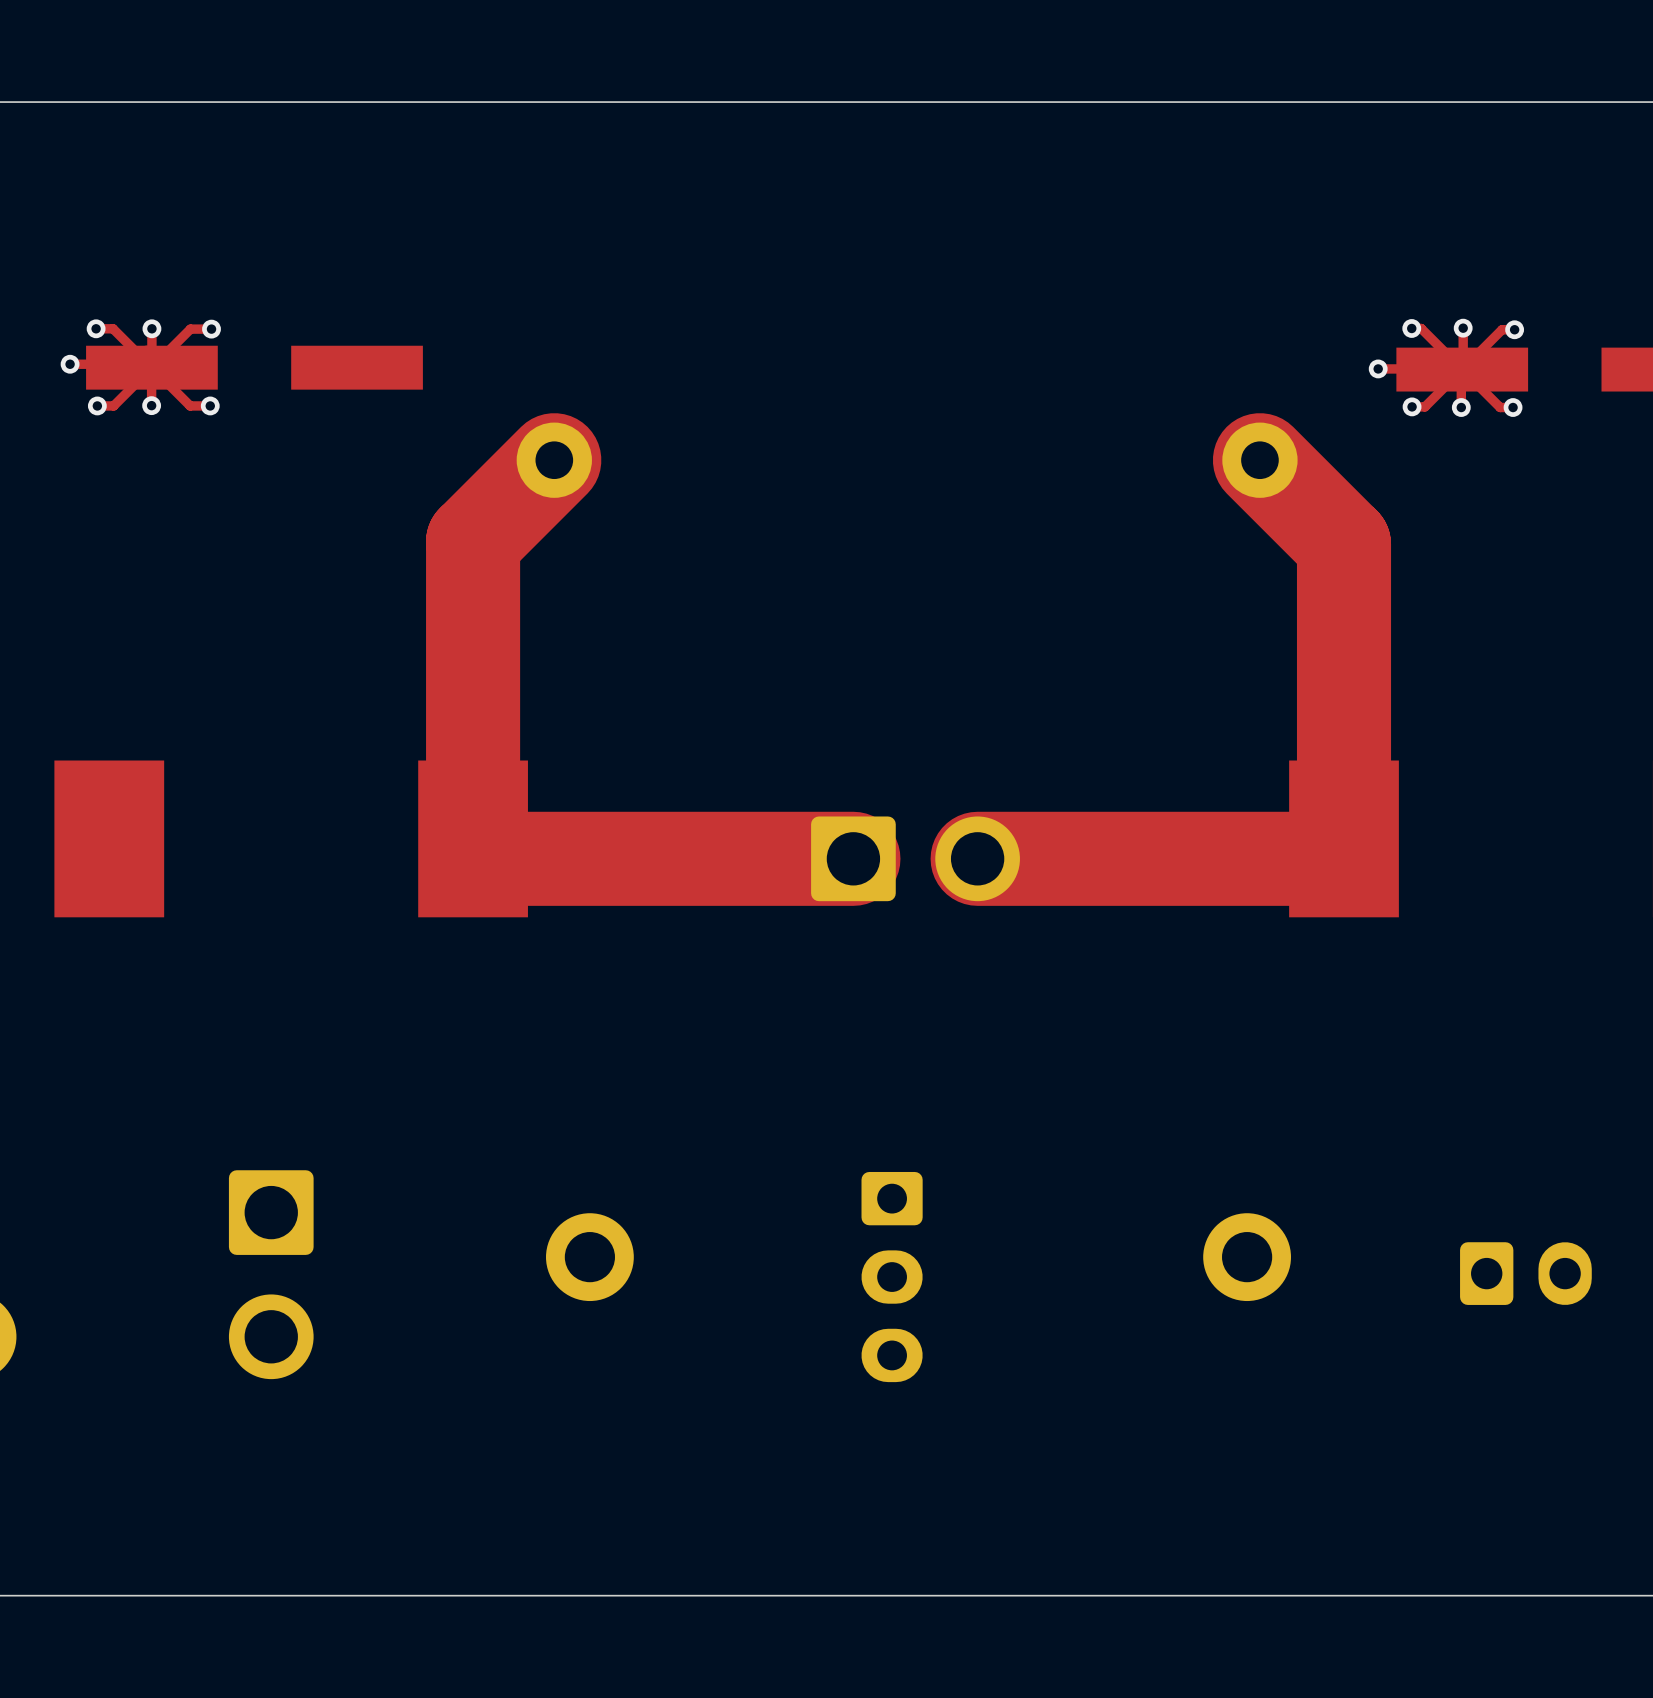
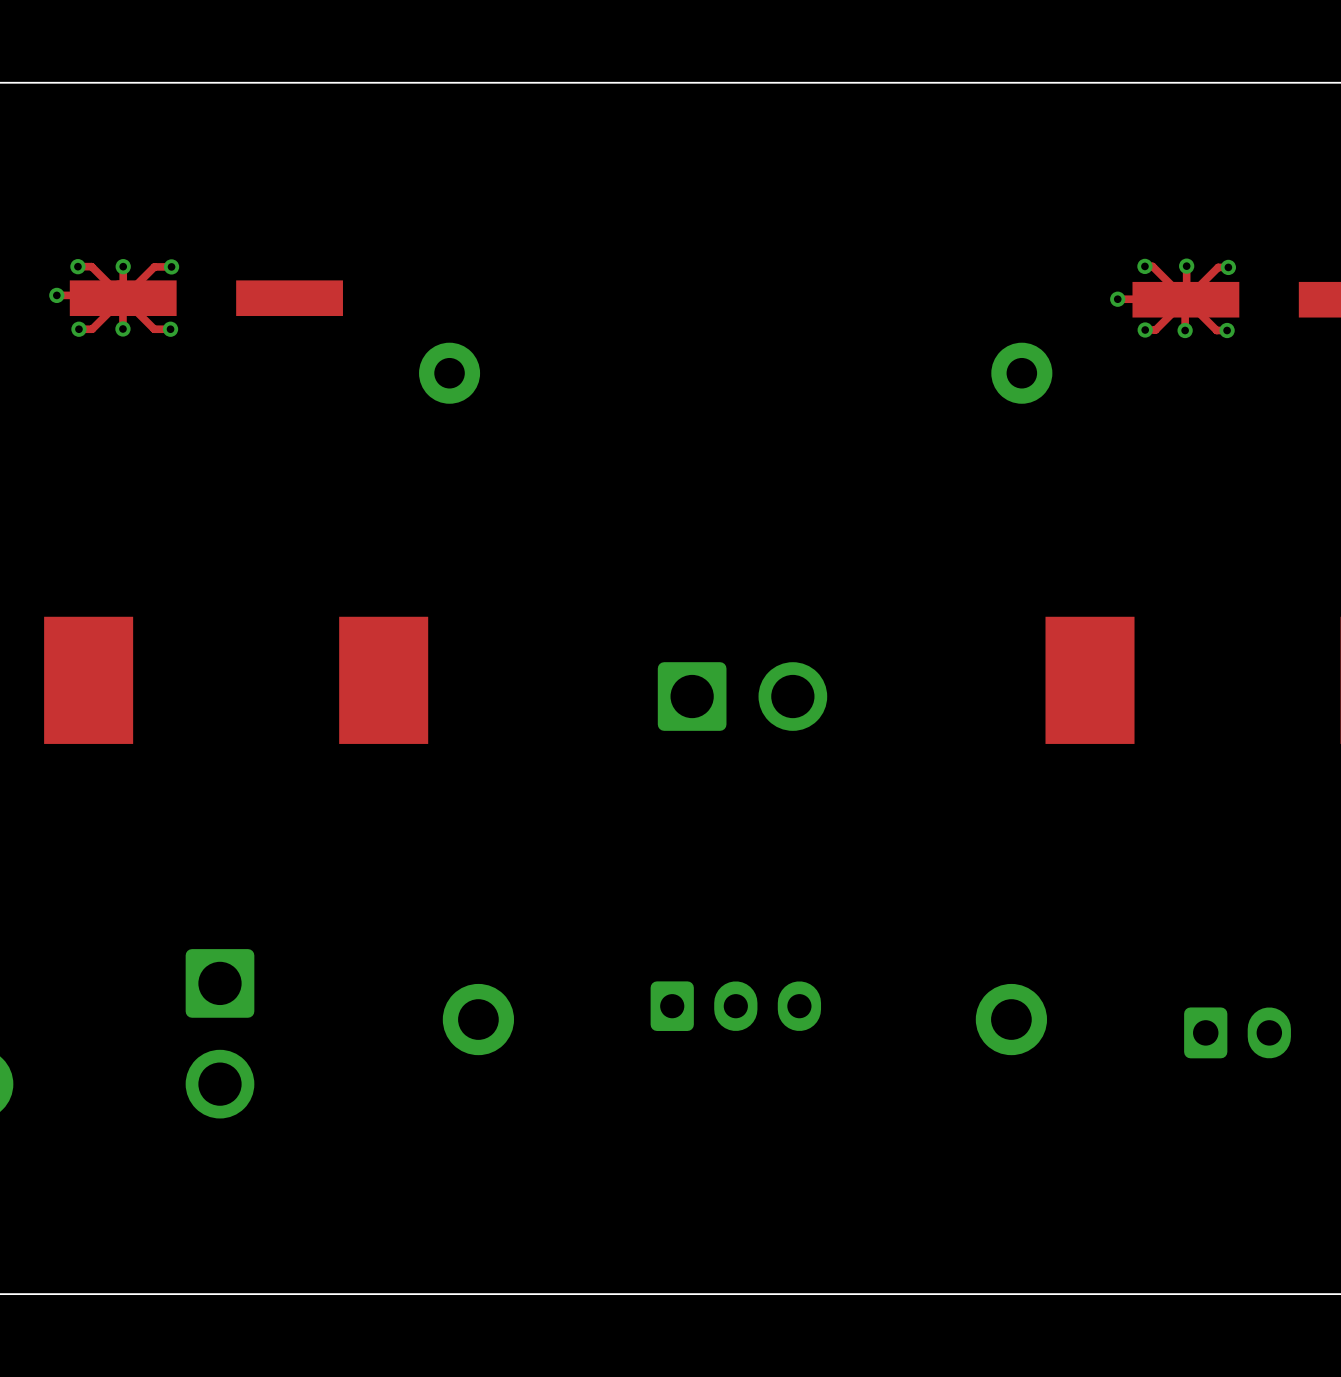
top track: (554, 460) (473, 541) (473, 838) (490, 838) (510, 858) (853, 858) -> none
top track: (1259, 460) (1344, 544) (1344, 838) (1324, 858) (977, 858) -> none
part rotation: 0° (892, 1277) -> 90° counterclockwise (735, 1006)

